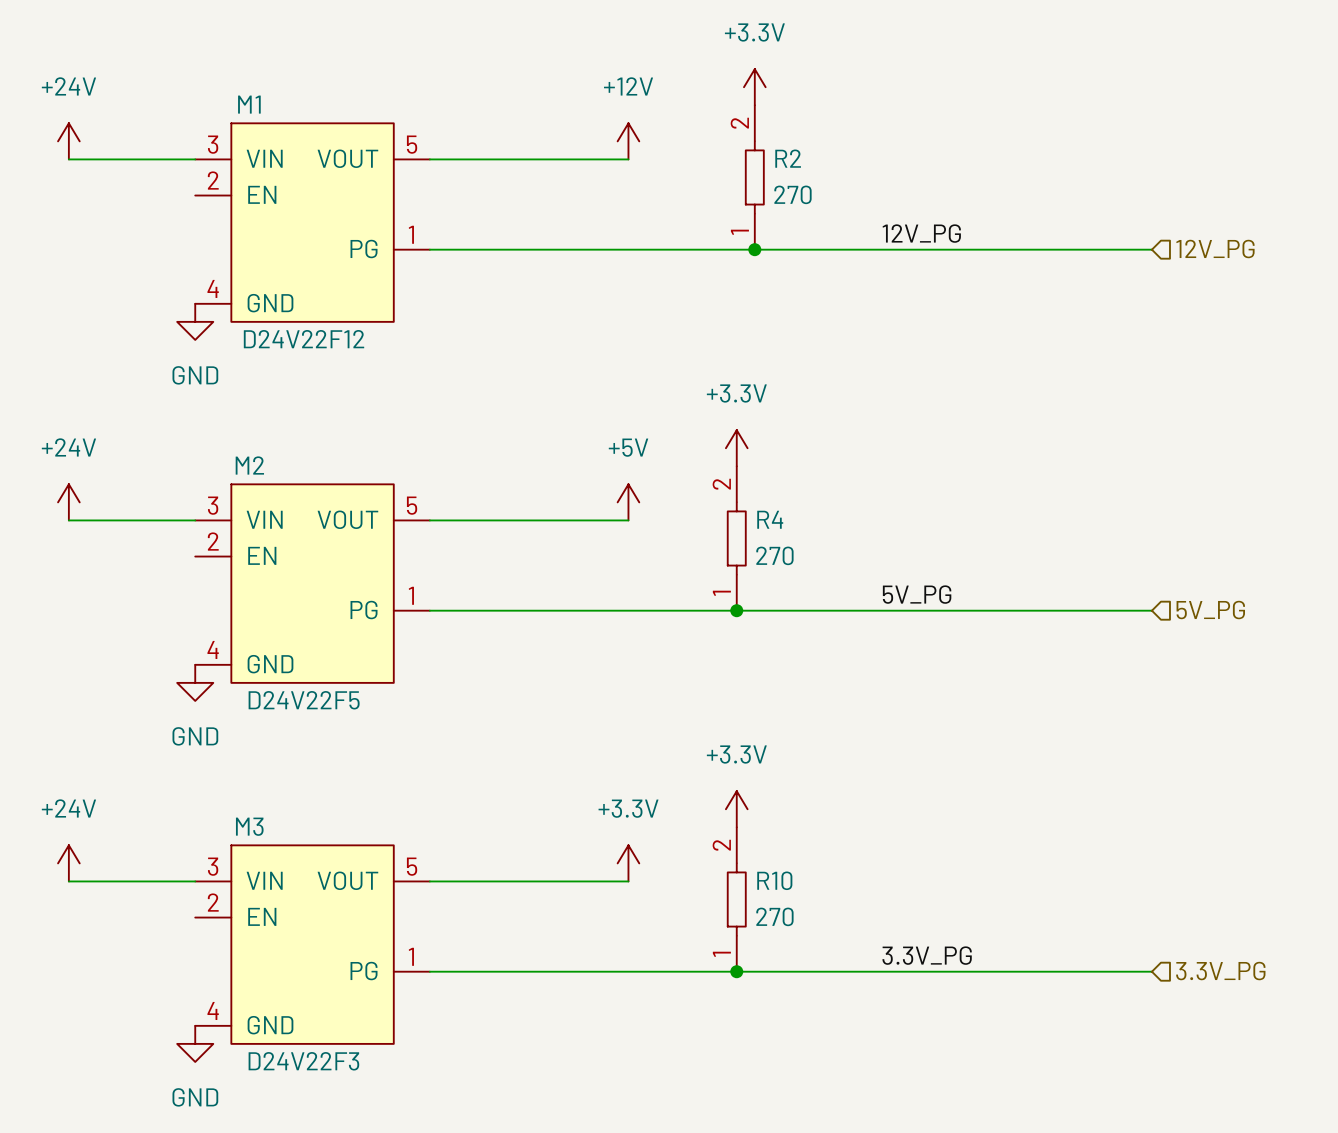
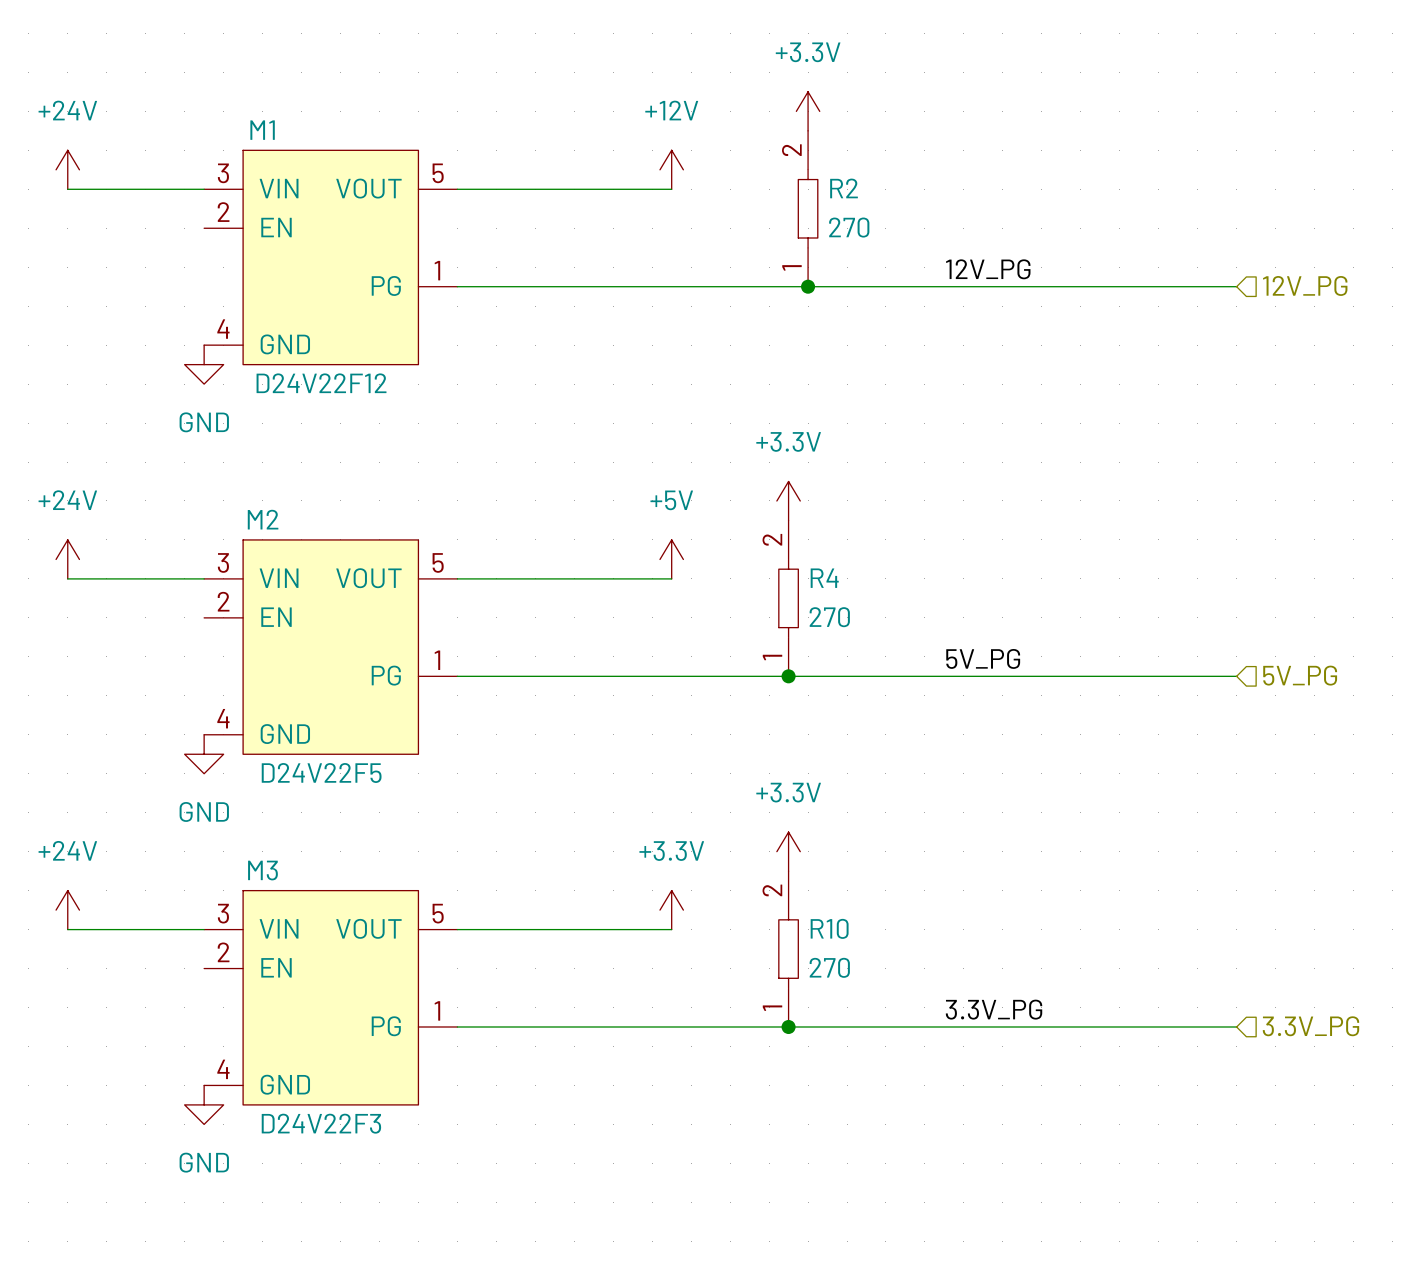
power symbol position: +3.3V (736, 809) -> +3.3V (788, 851)
power symbol position: +24V (68, 863) -> +24V (67, 910)
power symbol position: +3.3V (628, 863) -> +3.3V (671, 910)
wire: (68, 881) (195, 881) -> (67, 929) (204, 929)
wire: (429, 881) (628, 881) -> (457, 929) (671, 929)
R10 position: (736, 899) -> (788, 949)
M3 position: (312, 944) -> (330, 997)
label position: 3.3V_PG (927, 955) -> 3.3V_PG (994, 1009)
wire: (429, 971) (1151, 971) -> (457, 1026) (1236, 1026)
junction position: (736, 971) -> (788, 1026)
hierarchical label position: 3.3V_PG (1220, 971) -> 3.3V_PG (1310, 1026)
power symbol position: GND (195, 1043) -> GND (204, 1104)

